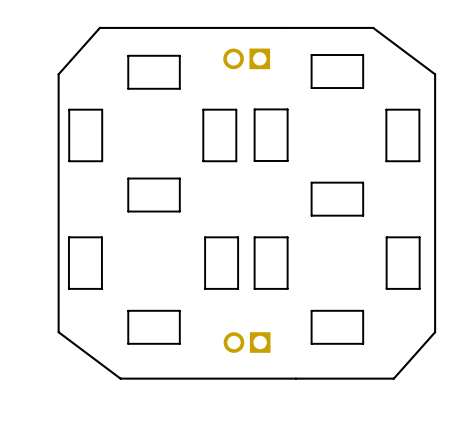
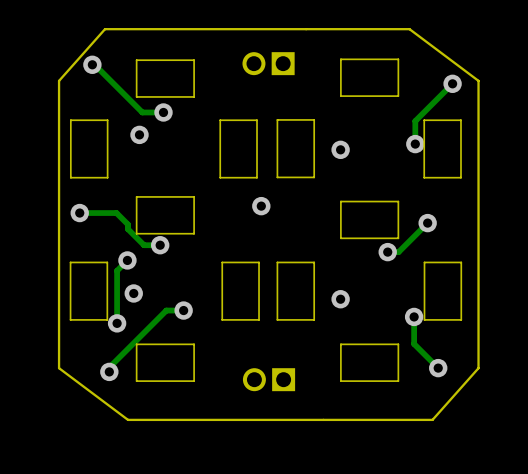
track: none -> (92, 64) (93, 63) (142, 112) (163, 112)
via: none -> (92, 64)
track: none -> (452, 83) (415, 121) (415, 144)
via: none -> (452, 83)
via: none -> (163, 112)
via: none -> (139, 134)
via: none -> (415, 144)
via: none -> (340, 149)
via: none -> (261, 206)
track: none -> (79, 213) (116, 213) (128, 224) (128, 229) (144, 245) (160, 245)
via: none -> (79, 213)
track: none -> (427, 223) (398, 252) (387, 252)
via: none -> (427, 223)
via: none -> (160, 245)
via: none -> (387, 252)
track: none -> (127, 260) (117, 270) (117, 323)
via: none -> (127, 260)
via: none -> (133, 293)
via: none -> (340, 299)
track: none -> (183, 310) (166, 310) (109, 367) (109, 371)
via: none -> (183, 310)
track: none -> (414, 316) (414, 344) (438, 368)
via: none -> (414, 316)
via: none -> (117, 323)
via: none -> (438, 368)
via: none -> (109, 371)

